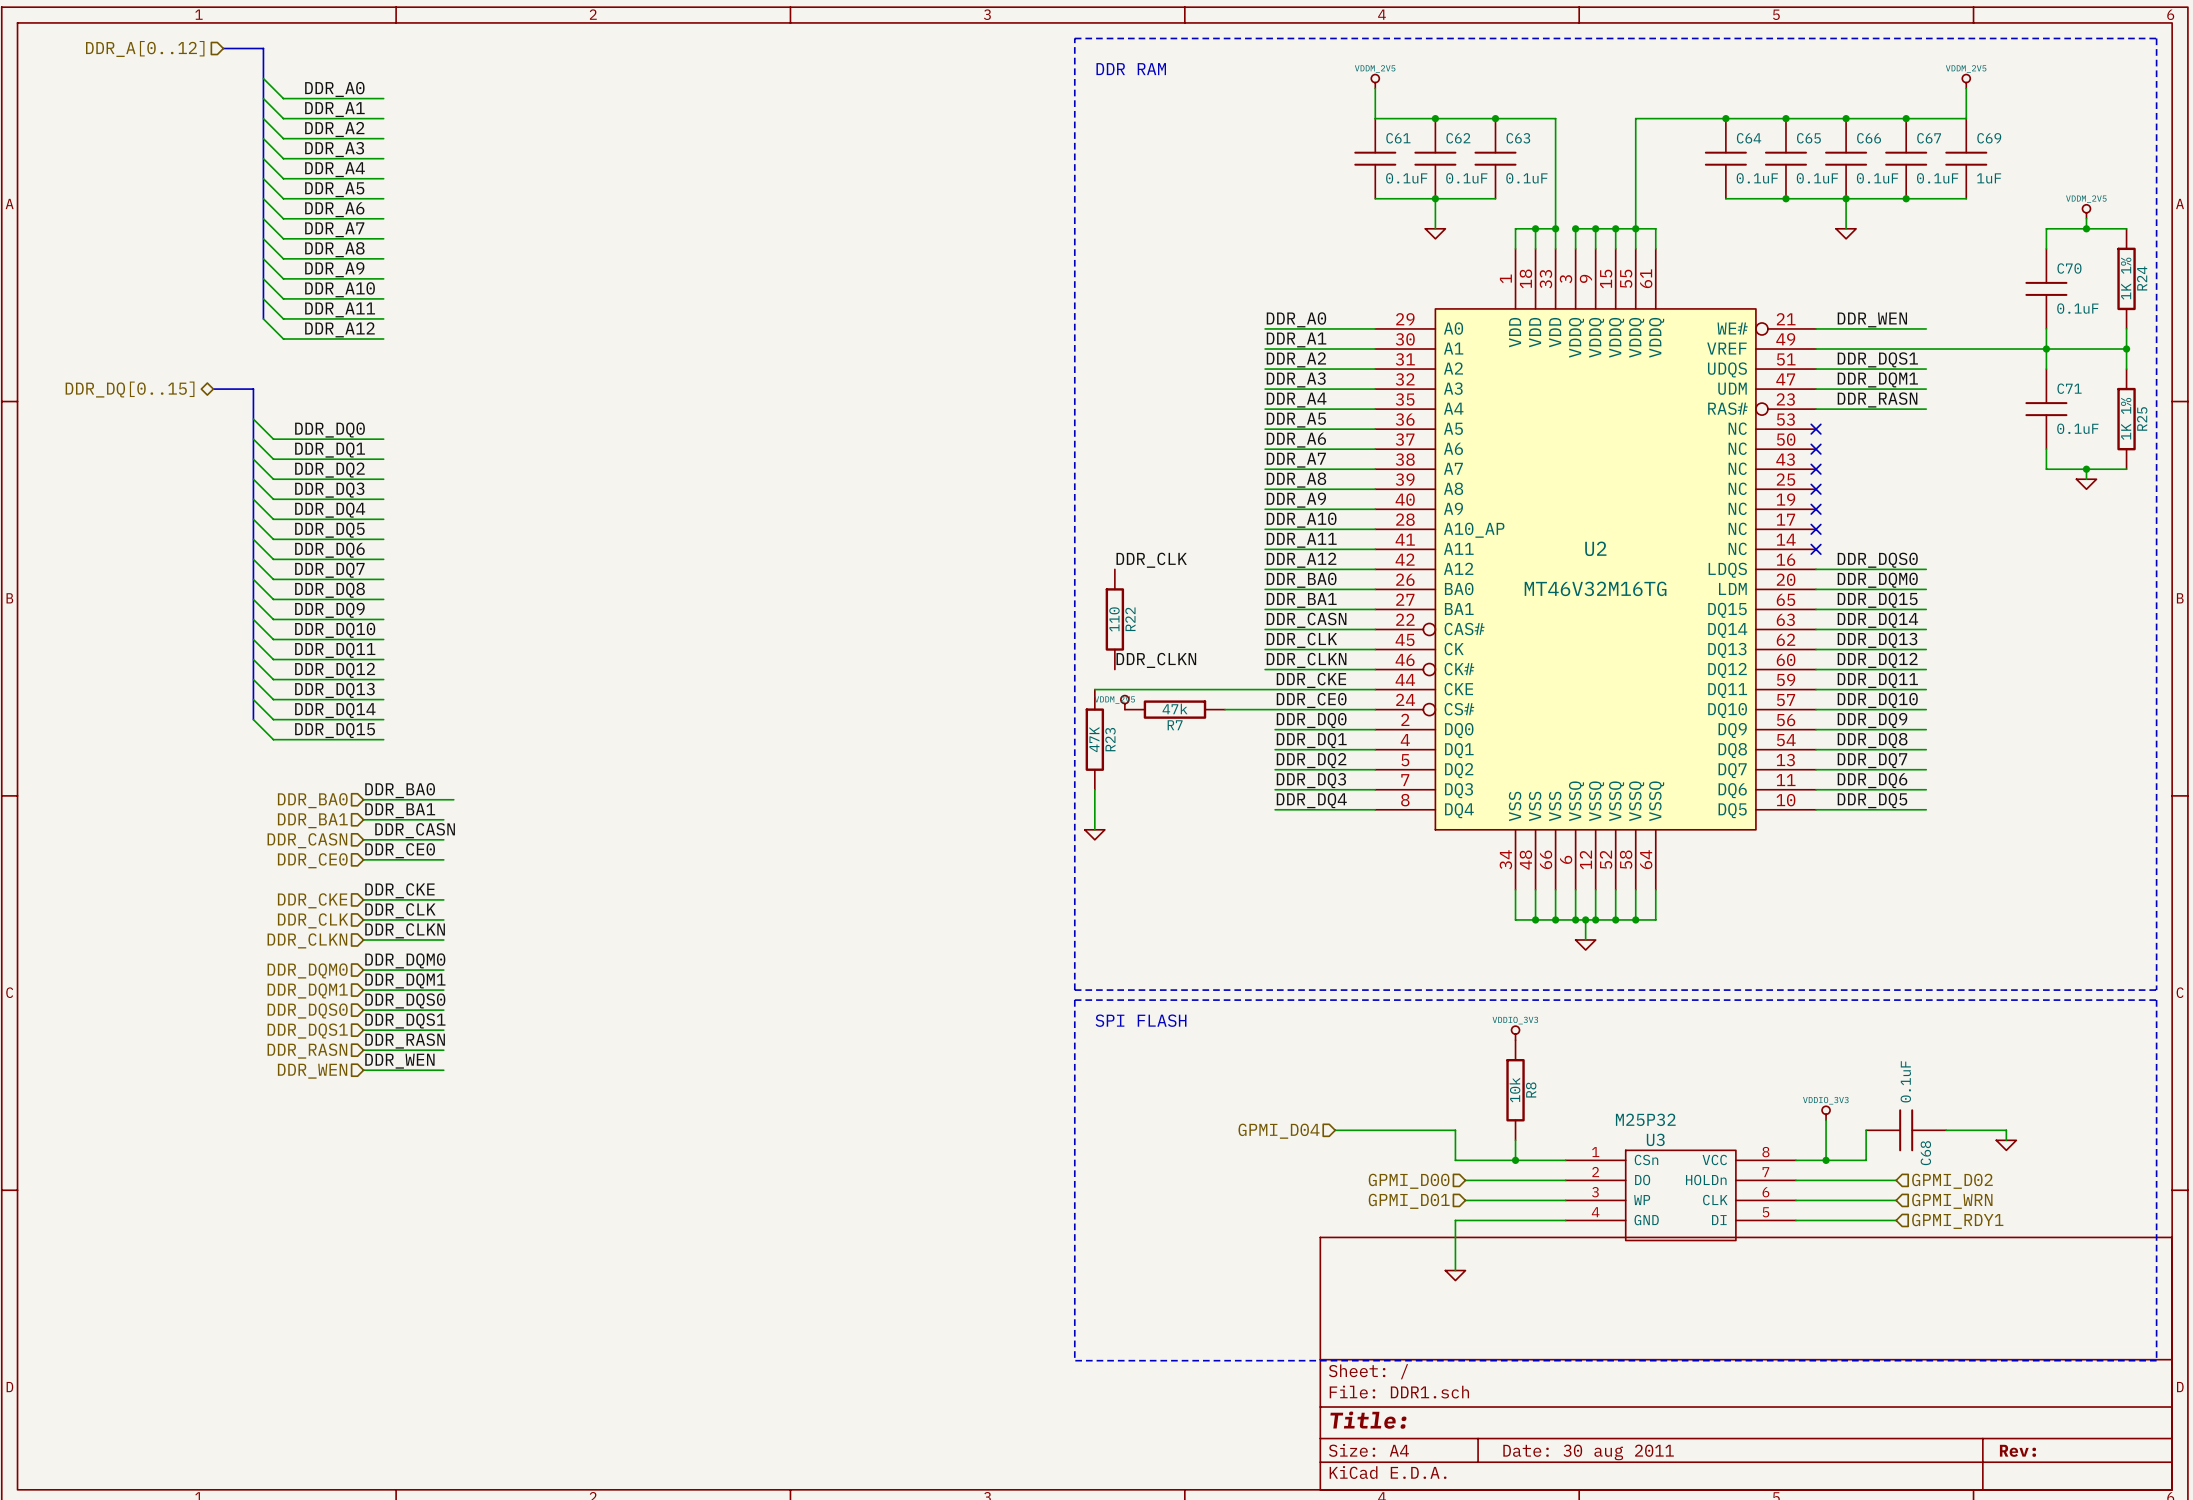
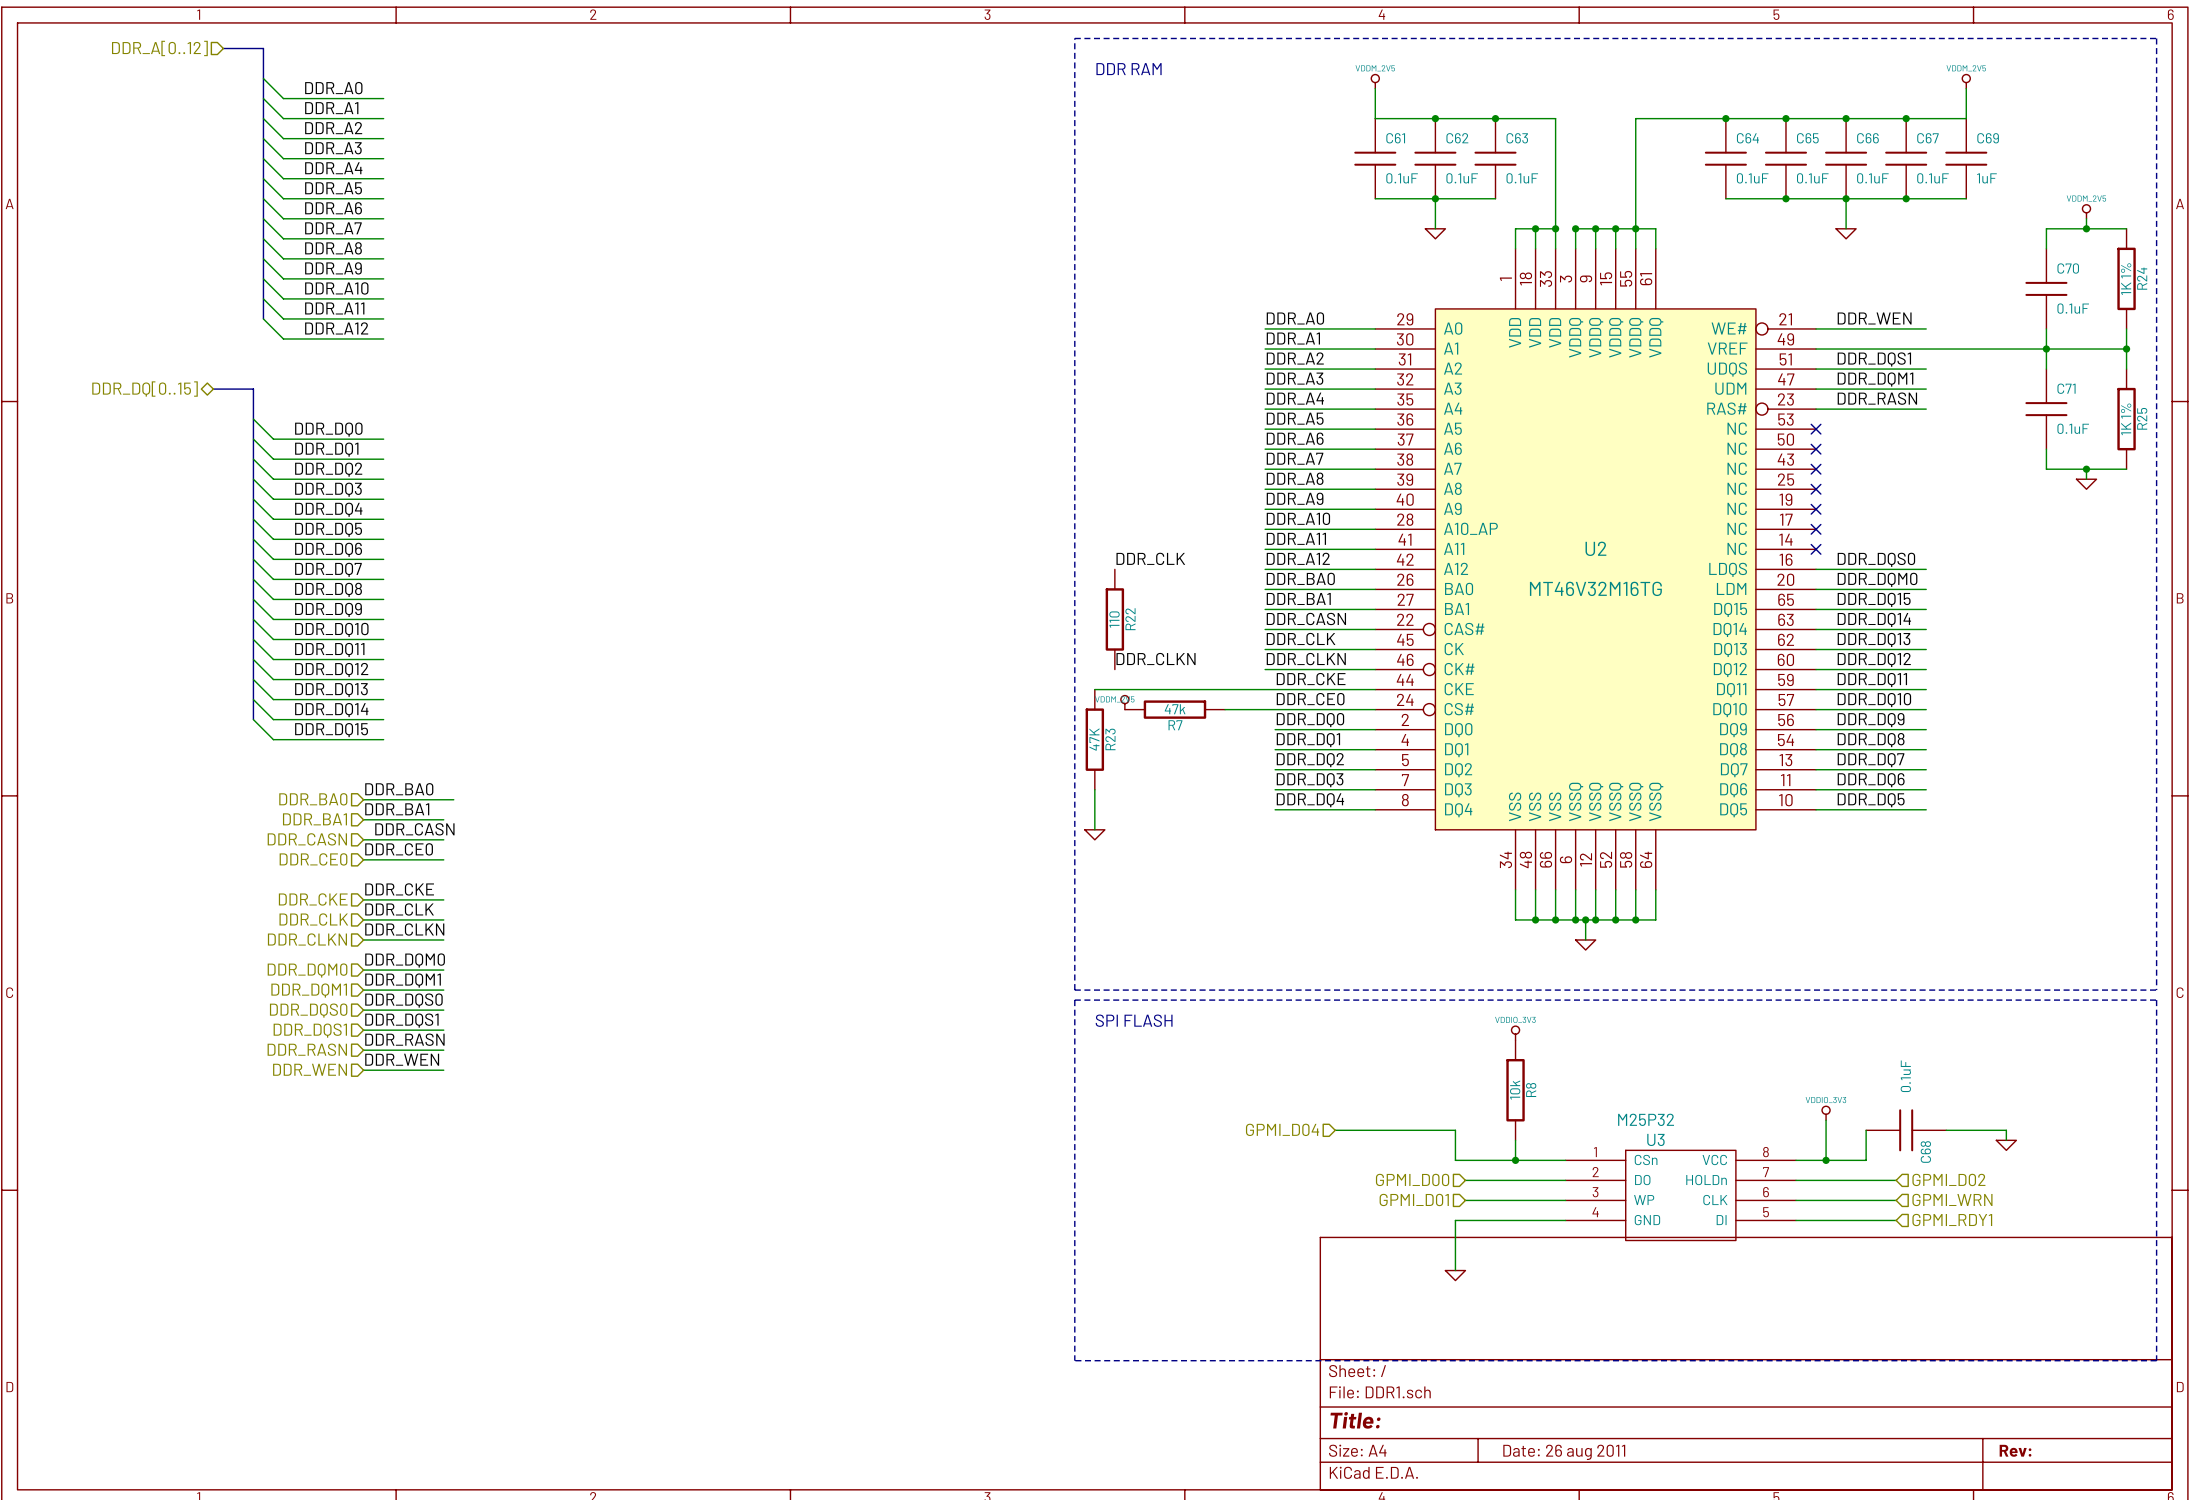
title block: Date: 30 aug 2011 (1588, 1452) -> Date: 26 aug 2011 (1564, 1452)

